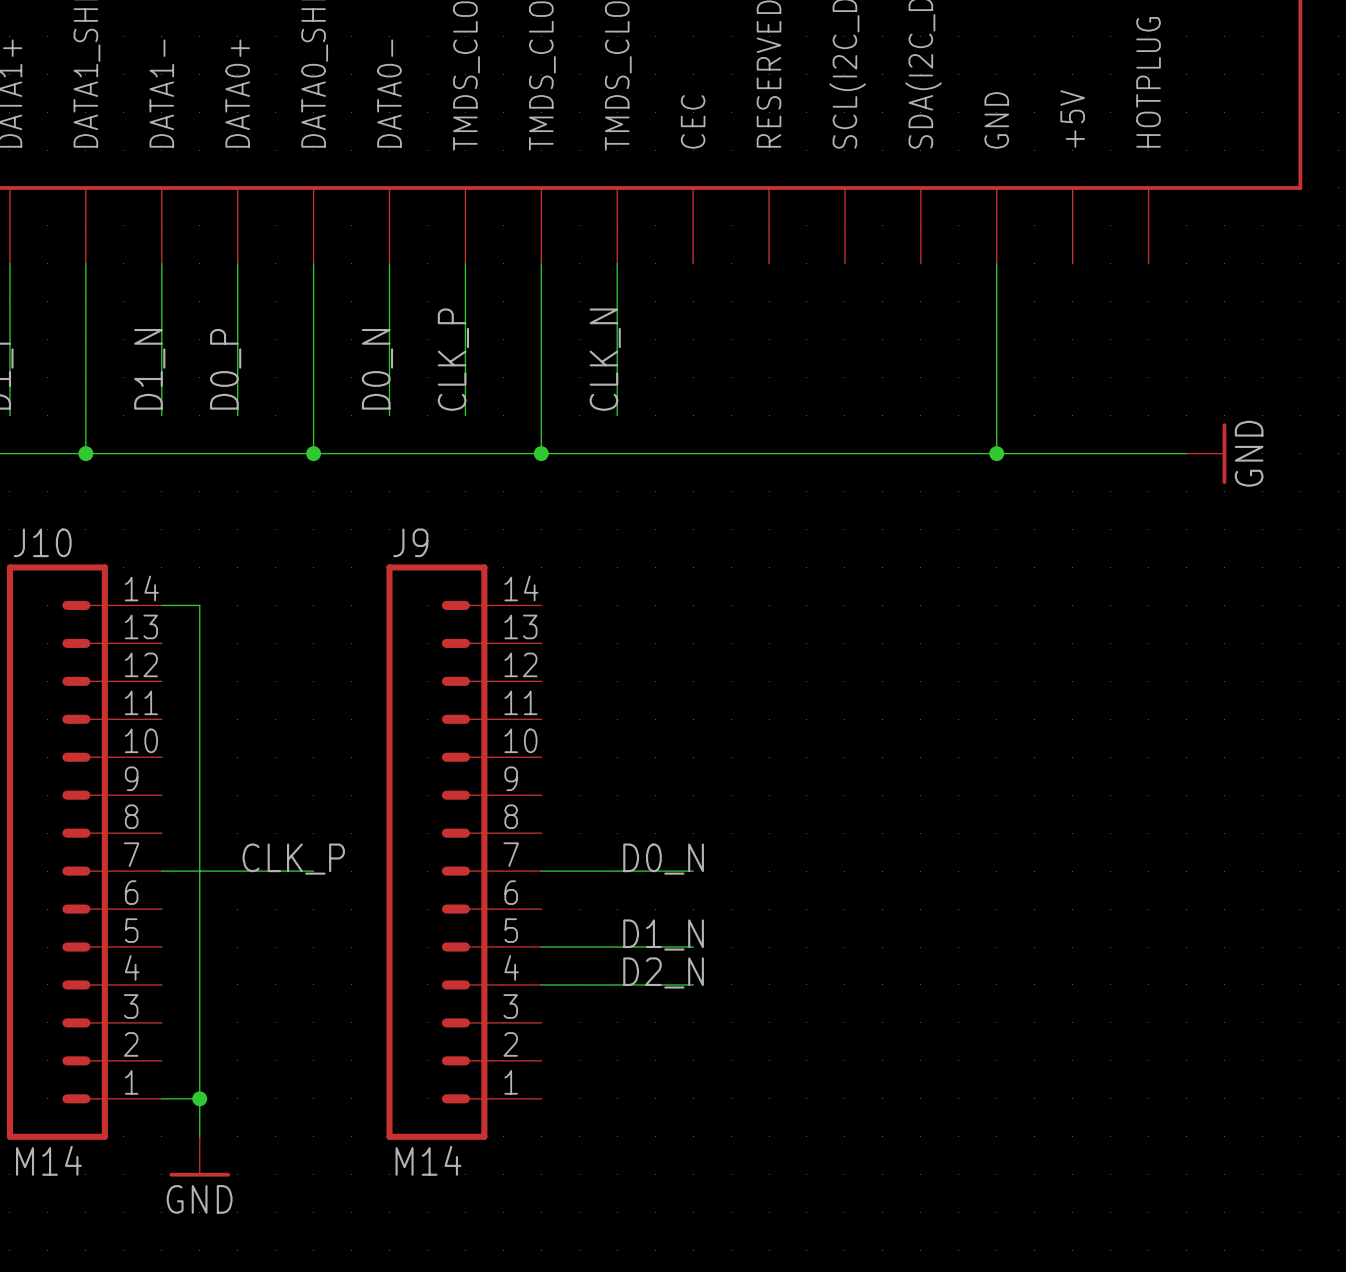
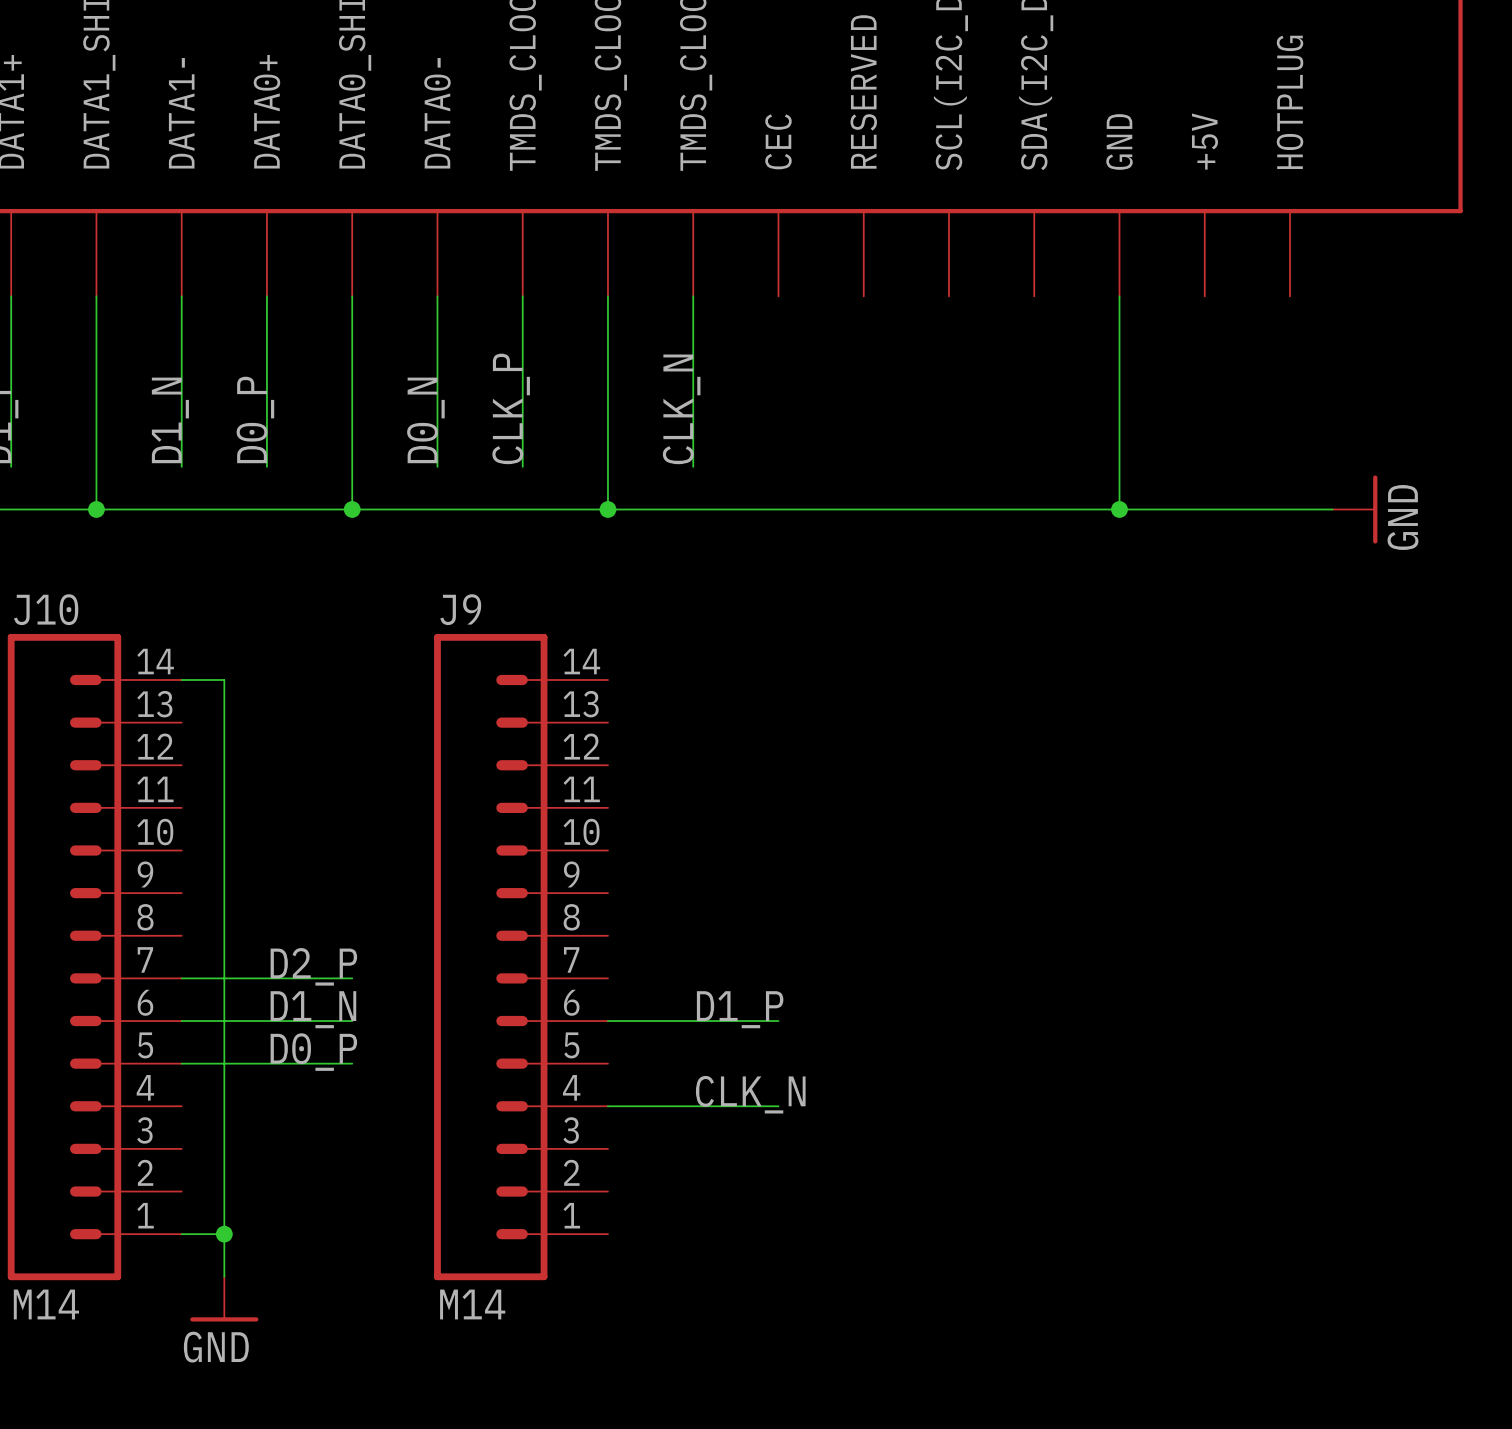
label: CLK_P (293, 859) -> D2_P (313, 966)
label: D0_N (663, 859) -> none
wire: (541, 871) (693, 871) -> none
label: none -> D1_N (313, 1009)
wire: none -> (181, 1021) (352, 1021)
label: none -> D0_P (313, 1052)
label: D1_N (663, 934) -> D1_P (740, 1009)
wire: none -> (181, 1063) (352, 1063)
wire: (541, 947) (693, 947) -> (607, 1021) (778, 1021)
label: D2_N (663, 972) -> CLK_N (750, 1094)

